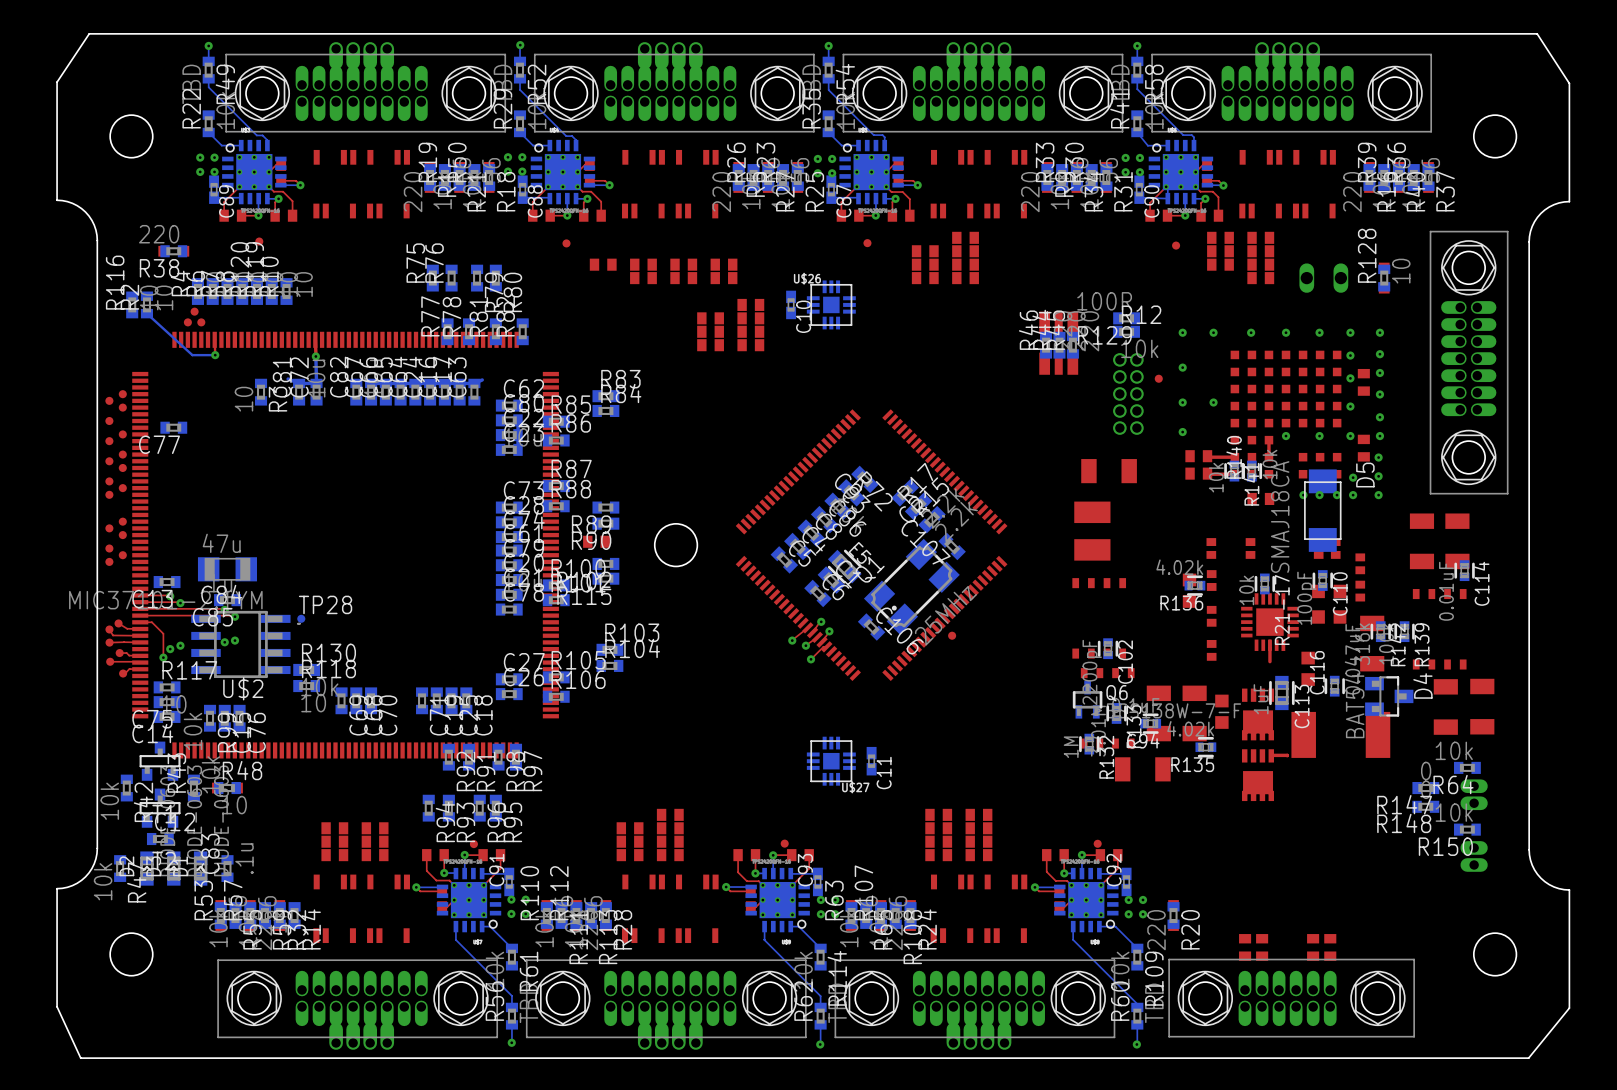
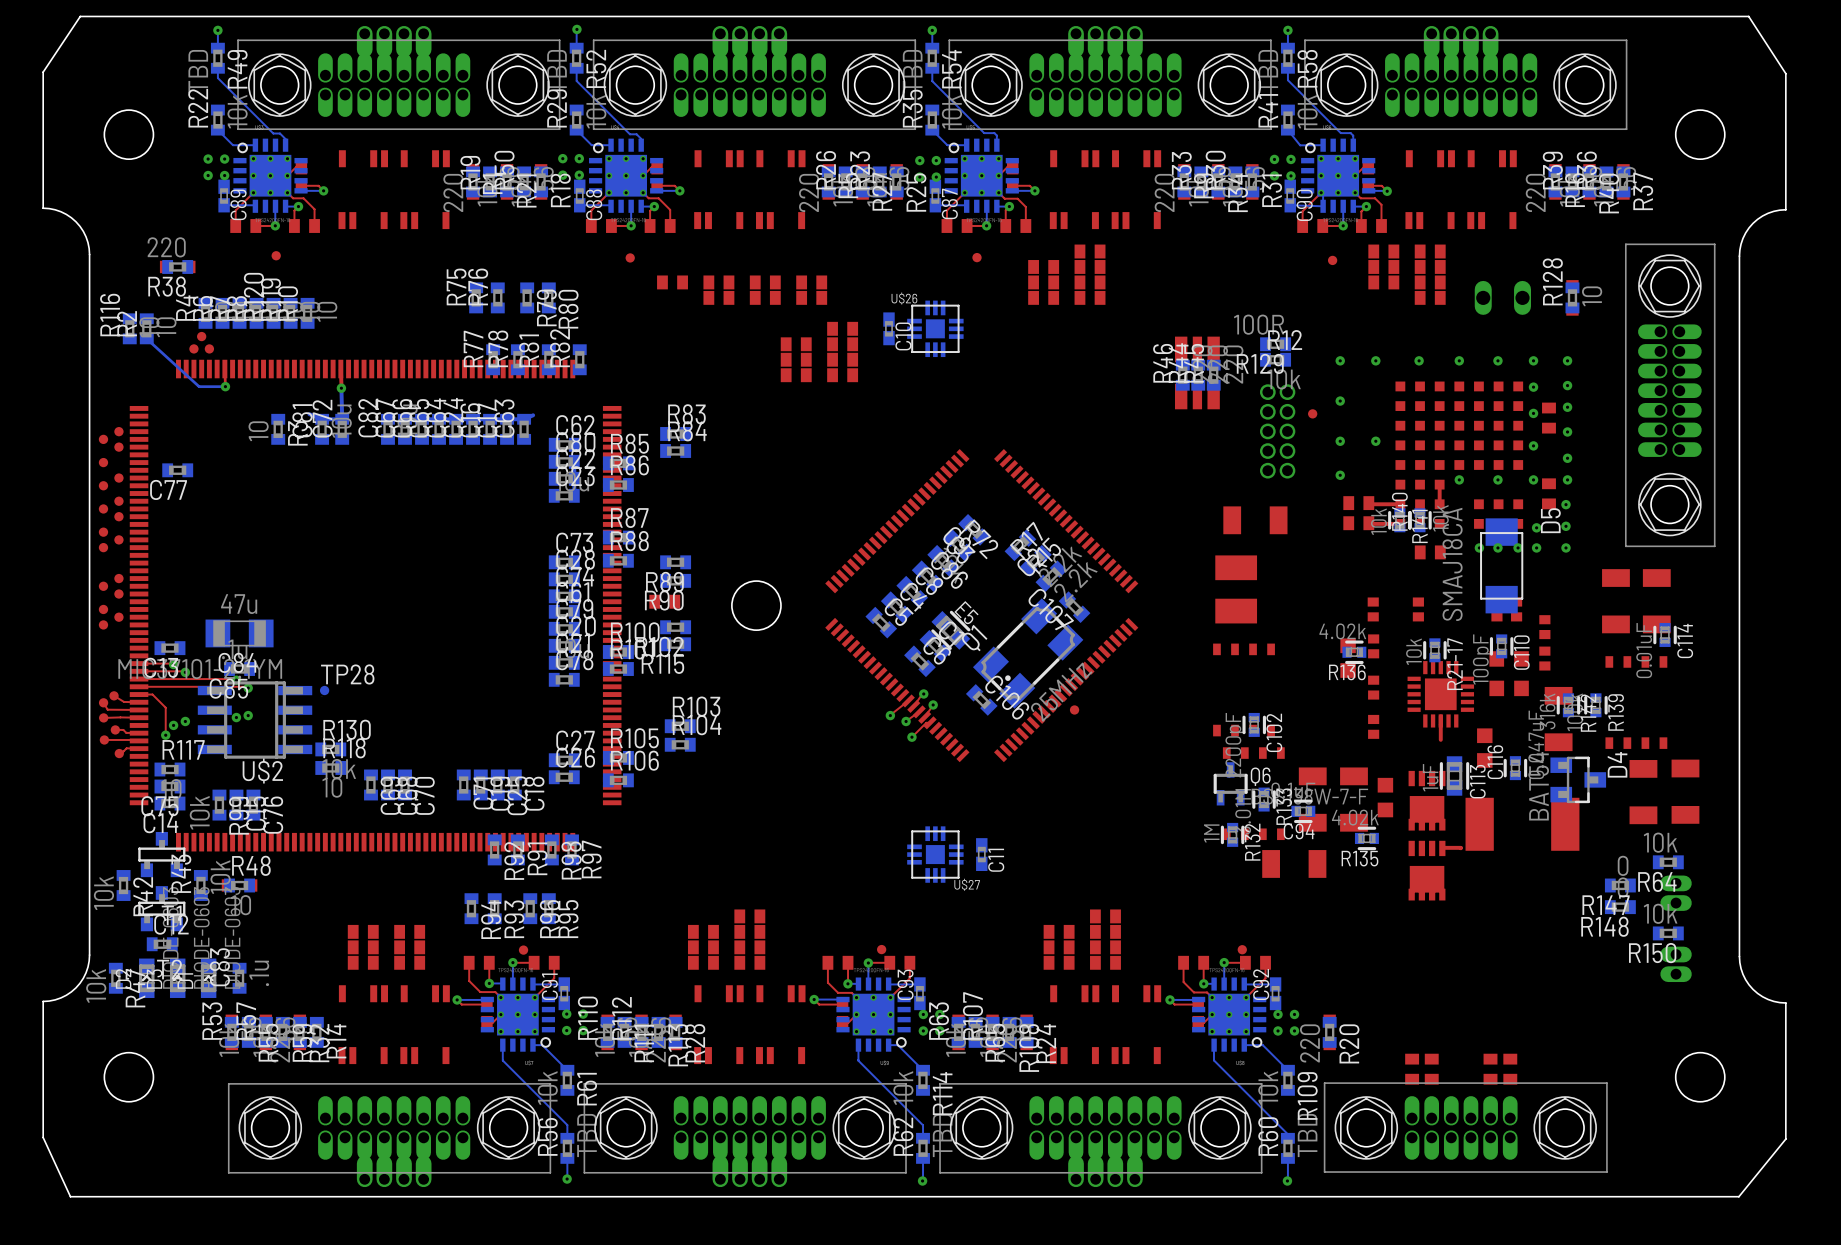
part: (938, 814) -> none

